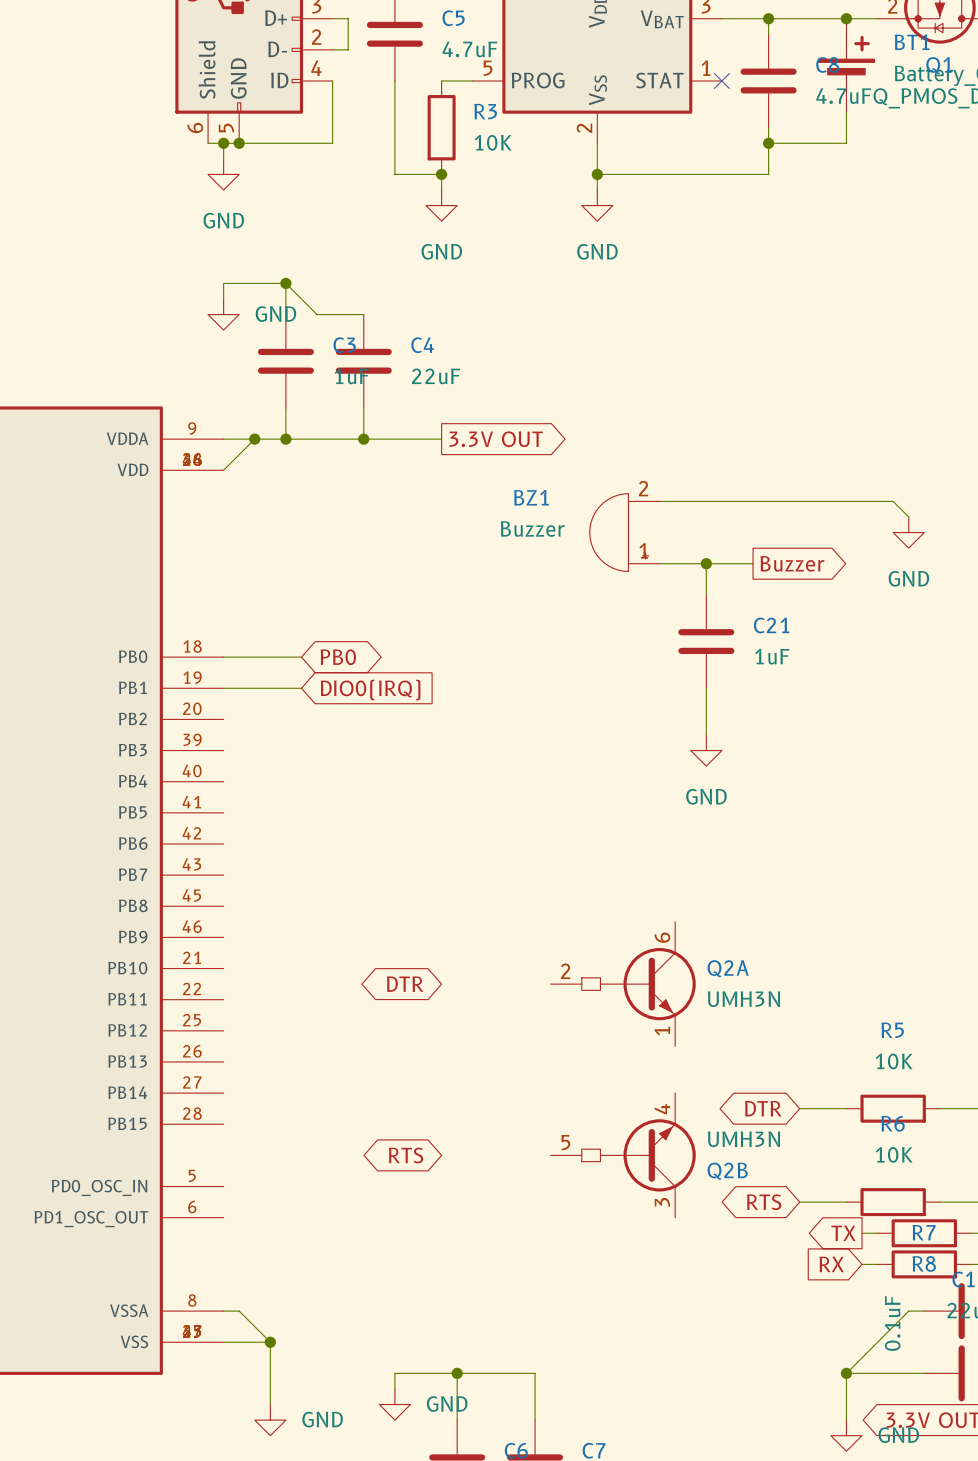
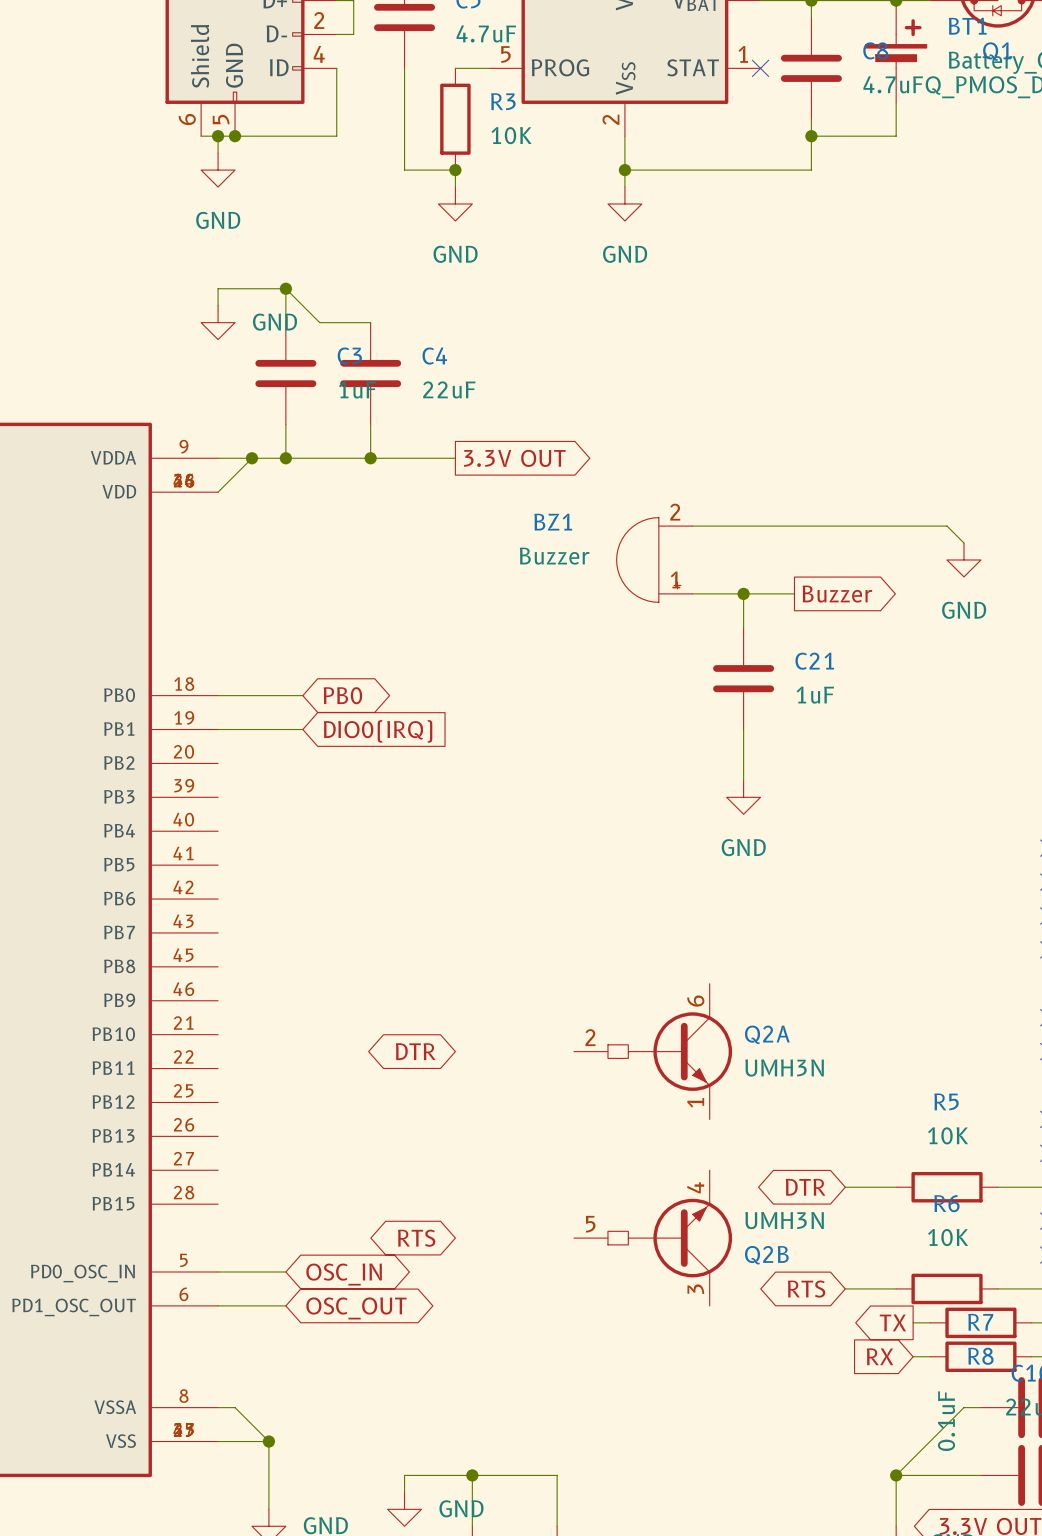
wire: none -> (218, 1272) (285, 1272)
global label: none -> OSC_IN (344, 1274)
wire: none -> (218, 1305) (285, 1305)
global label: none -> OSC_OUT (356, 1308)

